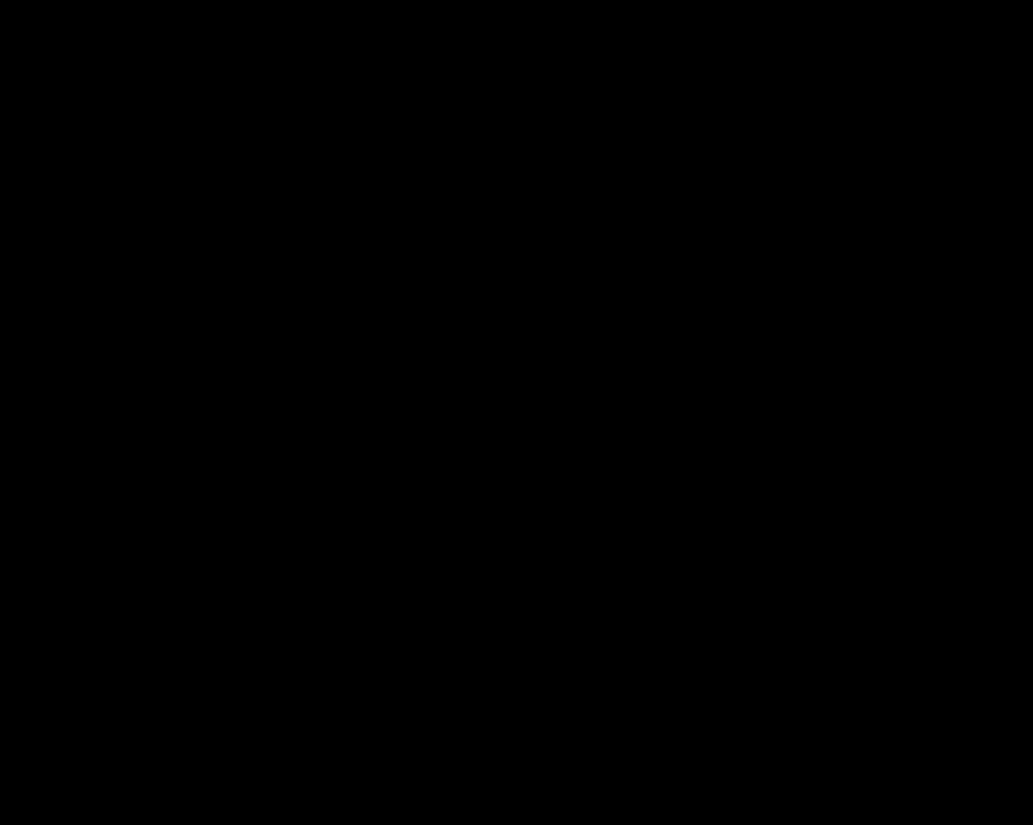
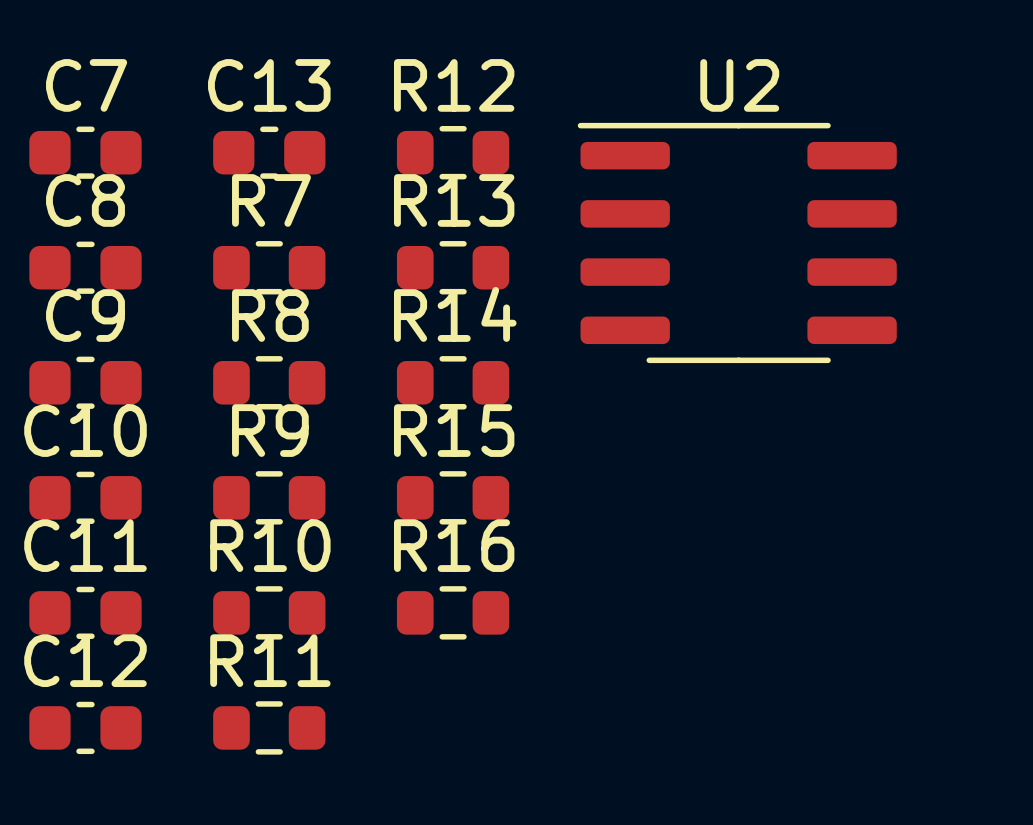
C7: none -> (85, 152)
C13: none -> (269, 152)
R12: none -> (453, 152)
U2: none -> (737, 242)
C8: none -> (85, 267)
R7: none -> (269, 267)
R13: none -> (453, 267)
C9: none -> (85, 382)
R8: none -> (269, 382)
R14: none -> (453, 382)
C10: none -> (85, 497)
R9: none -> (269, 497)
R15: none -> (453, 497)
C11: none -> (85, 612)
R10: none -> (269, 612)
R16: none -> (453, 612)
C12: none -> (85, 727)
R11: none -> (269, 727)

